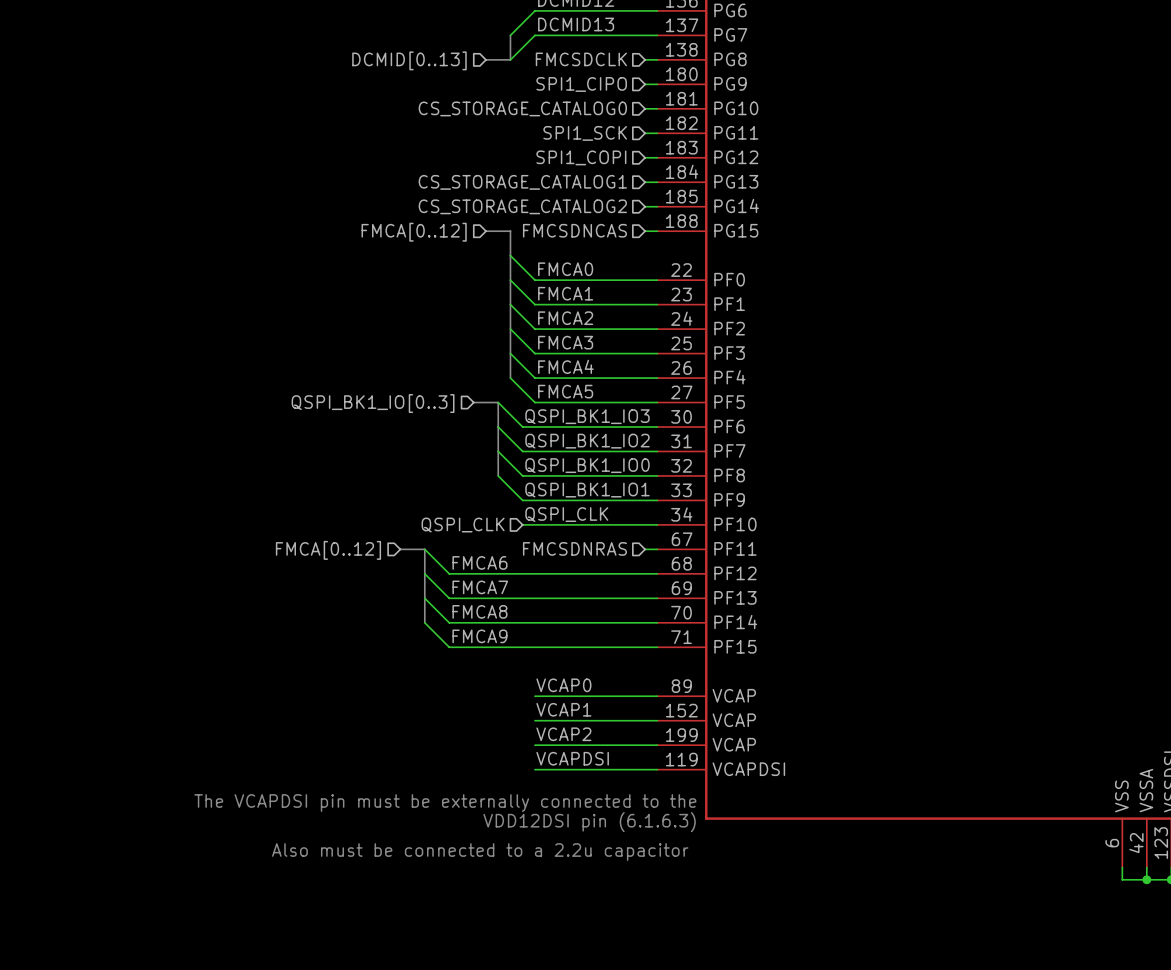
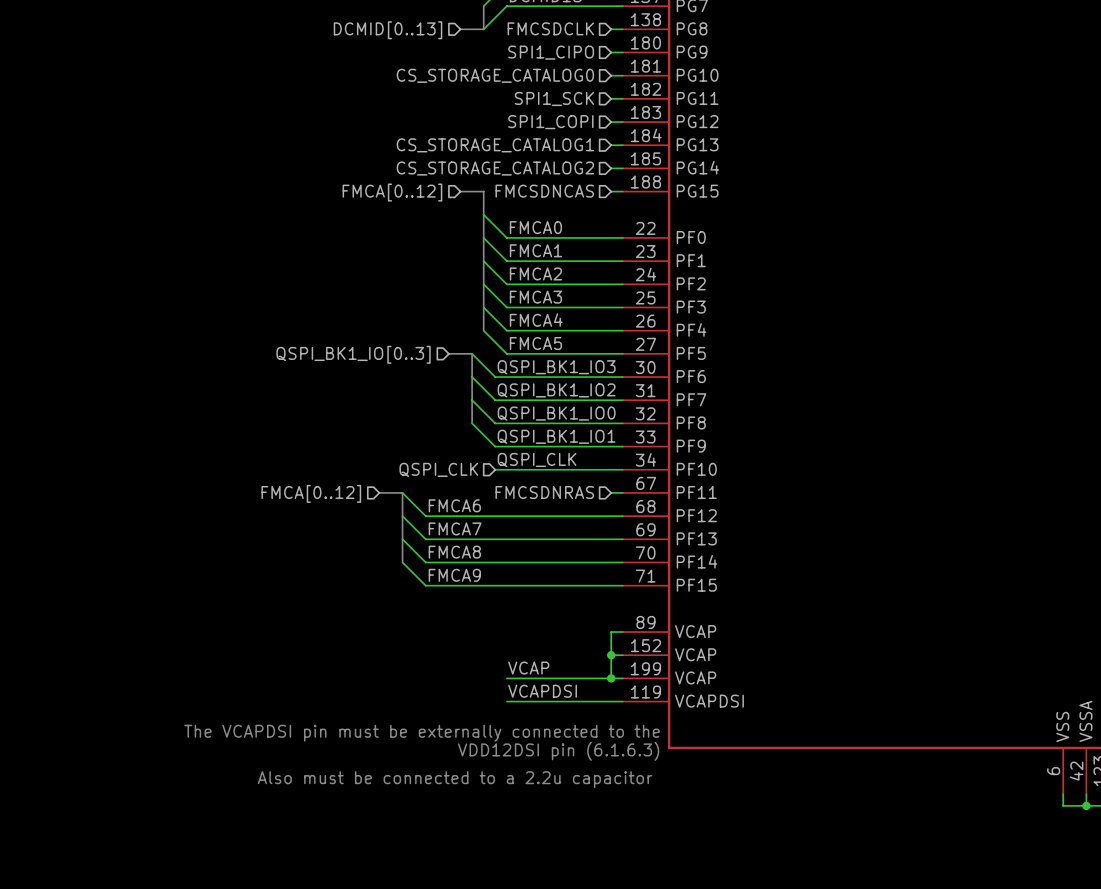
label: VCAP0 (563, 685) -> none
wire: (534, 696) (645, 696) -> (611, 678) (611, 632)
label: VCAP1 (563, 709) -> none
wire: (534, 720) (645, 720) -> none
junction: none -> (611, 655)
label: VCAP2 (563, 734) -> VCAP (528, 668)
junction: none -> (611, 678)

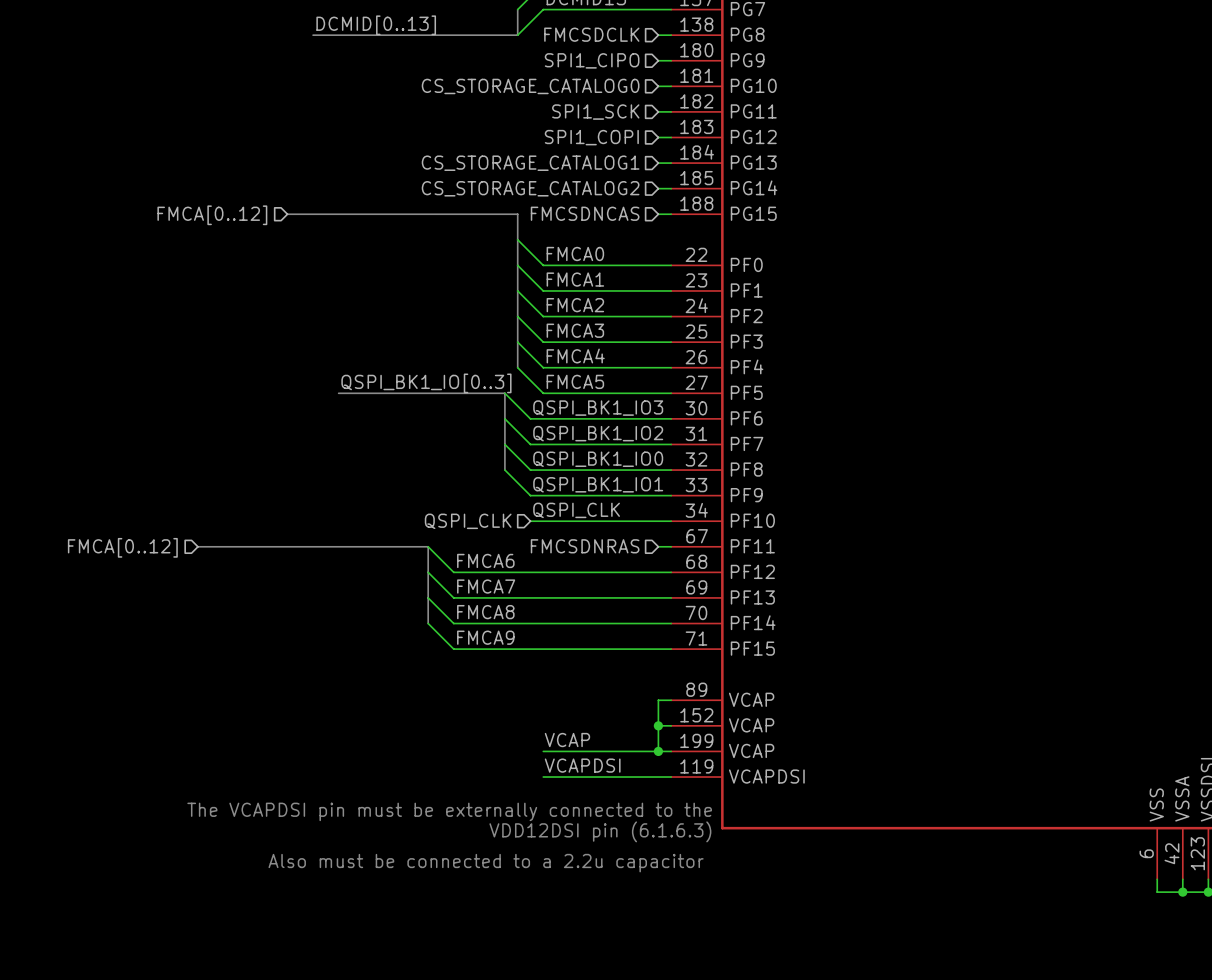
label: none -> DCMID[0..13] (376, 25)
bus: none -> (313, 35) (492, 35)
hierarchical label: DCMID[0..13] (388, 30) -> none
bus: none -> (287, 214) (492, 214)
hierarchical label: none -> FMCA[0..12] (212, 215)
hierarchical label: FMCA[0..12] (392, 192) -> none
label: none -> QSPI_BK1_IO[0..3] (426, 383)
bus: none -> (338, 393) (479, 393)
hierarchical label: QSPI_BK1_IO[0..3] (353, 354) -> none
bus: none -> (197, 546) (402, 546)
hierarchical label: none -> FMCA[0..12] (122, 547)
hierarchical label: FMCA[0..12] (311, 493) -> none

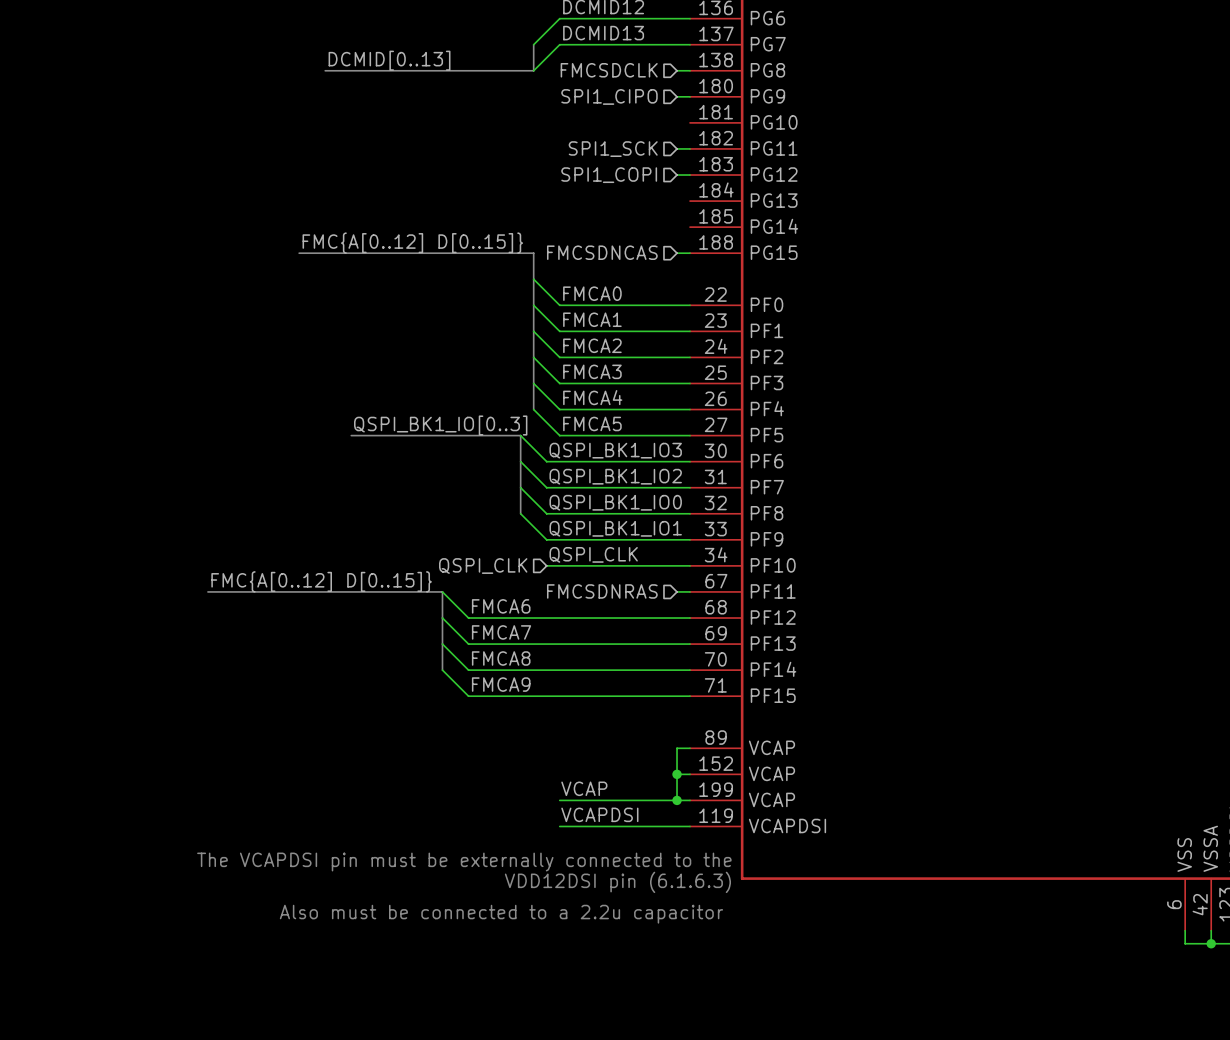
hierarchical label: CS_STORAGE_CATALOG0 (530, 86) -> none
wire: (658, 86) (671, 86) -> none
hierarchical label: CS_STORAGE_CATALOG1 (530, 163) -> none
wire: (658, 163) (671, 163) -> none
hierarchical label: CS_STORAGE_CATALOG2 (530, 188) -> none
wire: (658, 188) (671, 188) -> none
label: none -> FMC{A[0..12] D[0..15]} (412, 243)
hierarchical label: FMCA[0..12] (212, 215) -> none
label: none -> FMC{A[0..12] D[0..15]} (321, 581)
hierarchical label: FMCA[0..12] (122, 547) -> none

